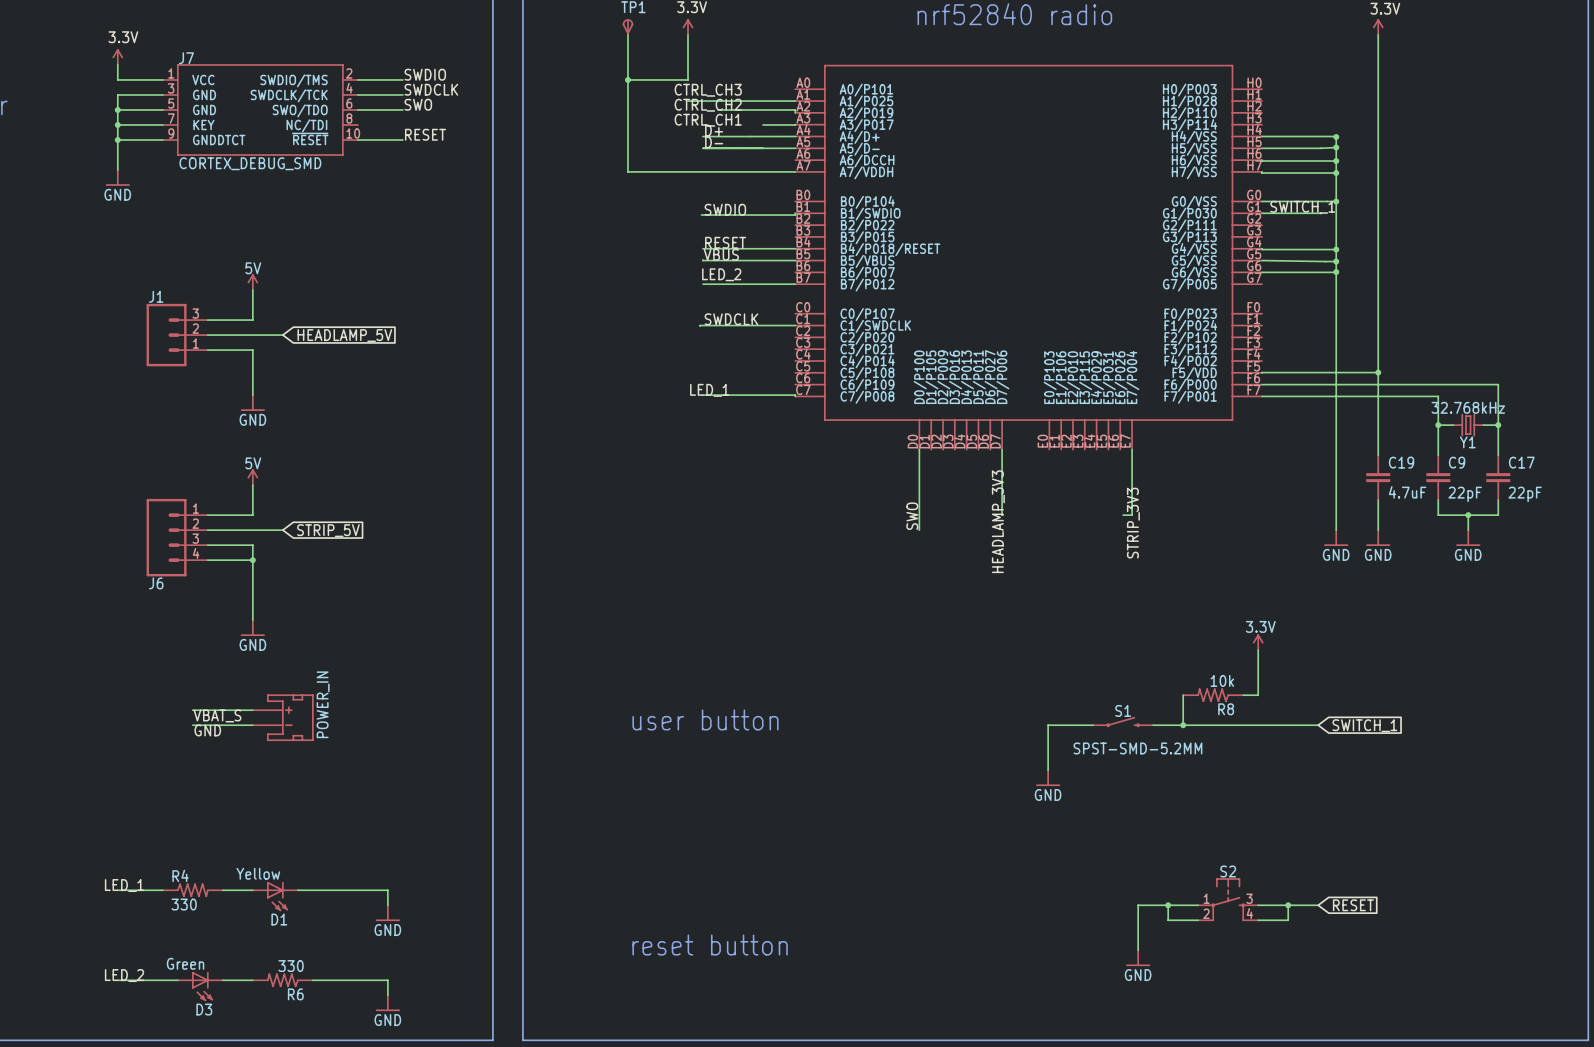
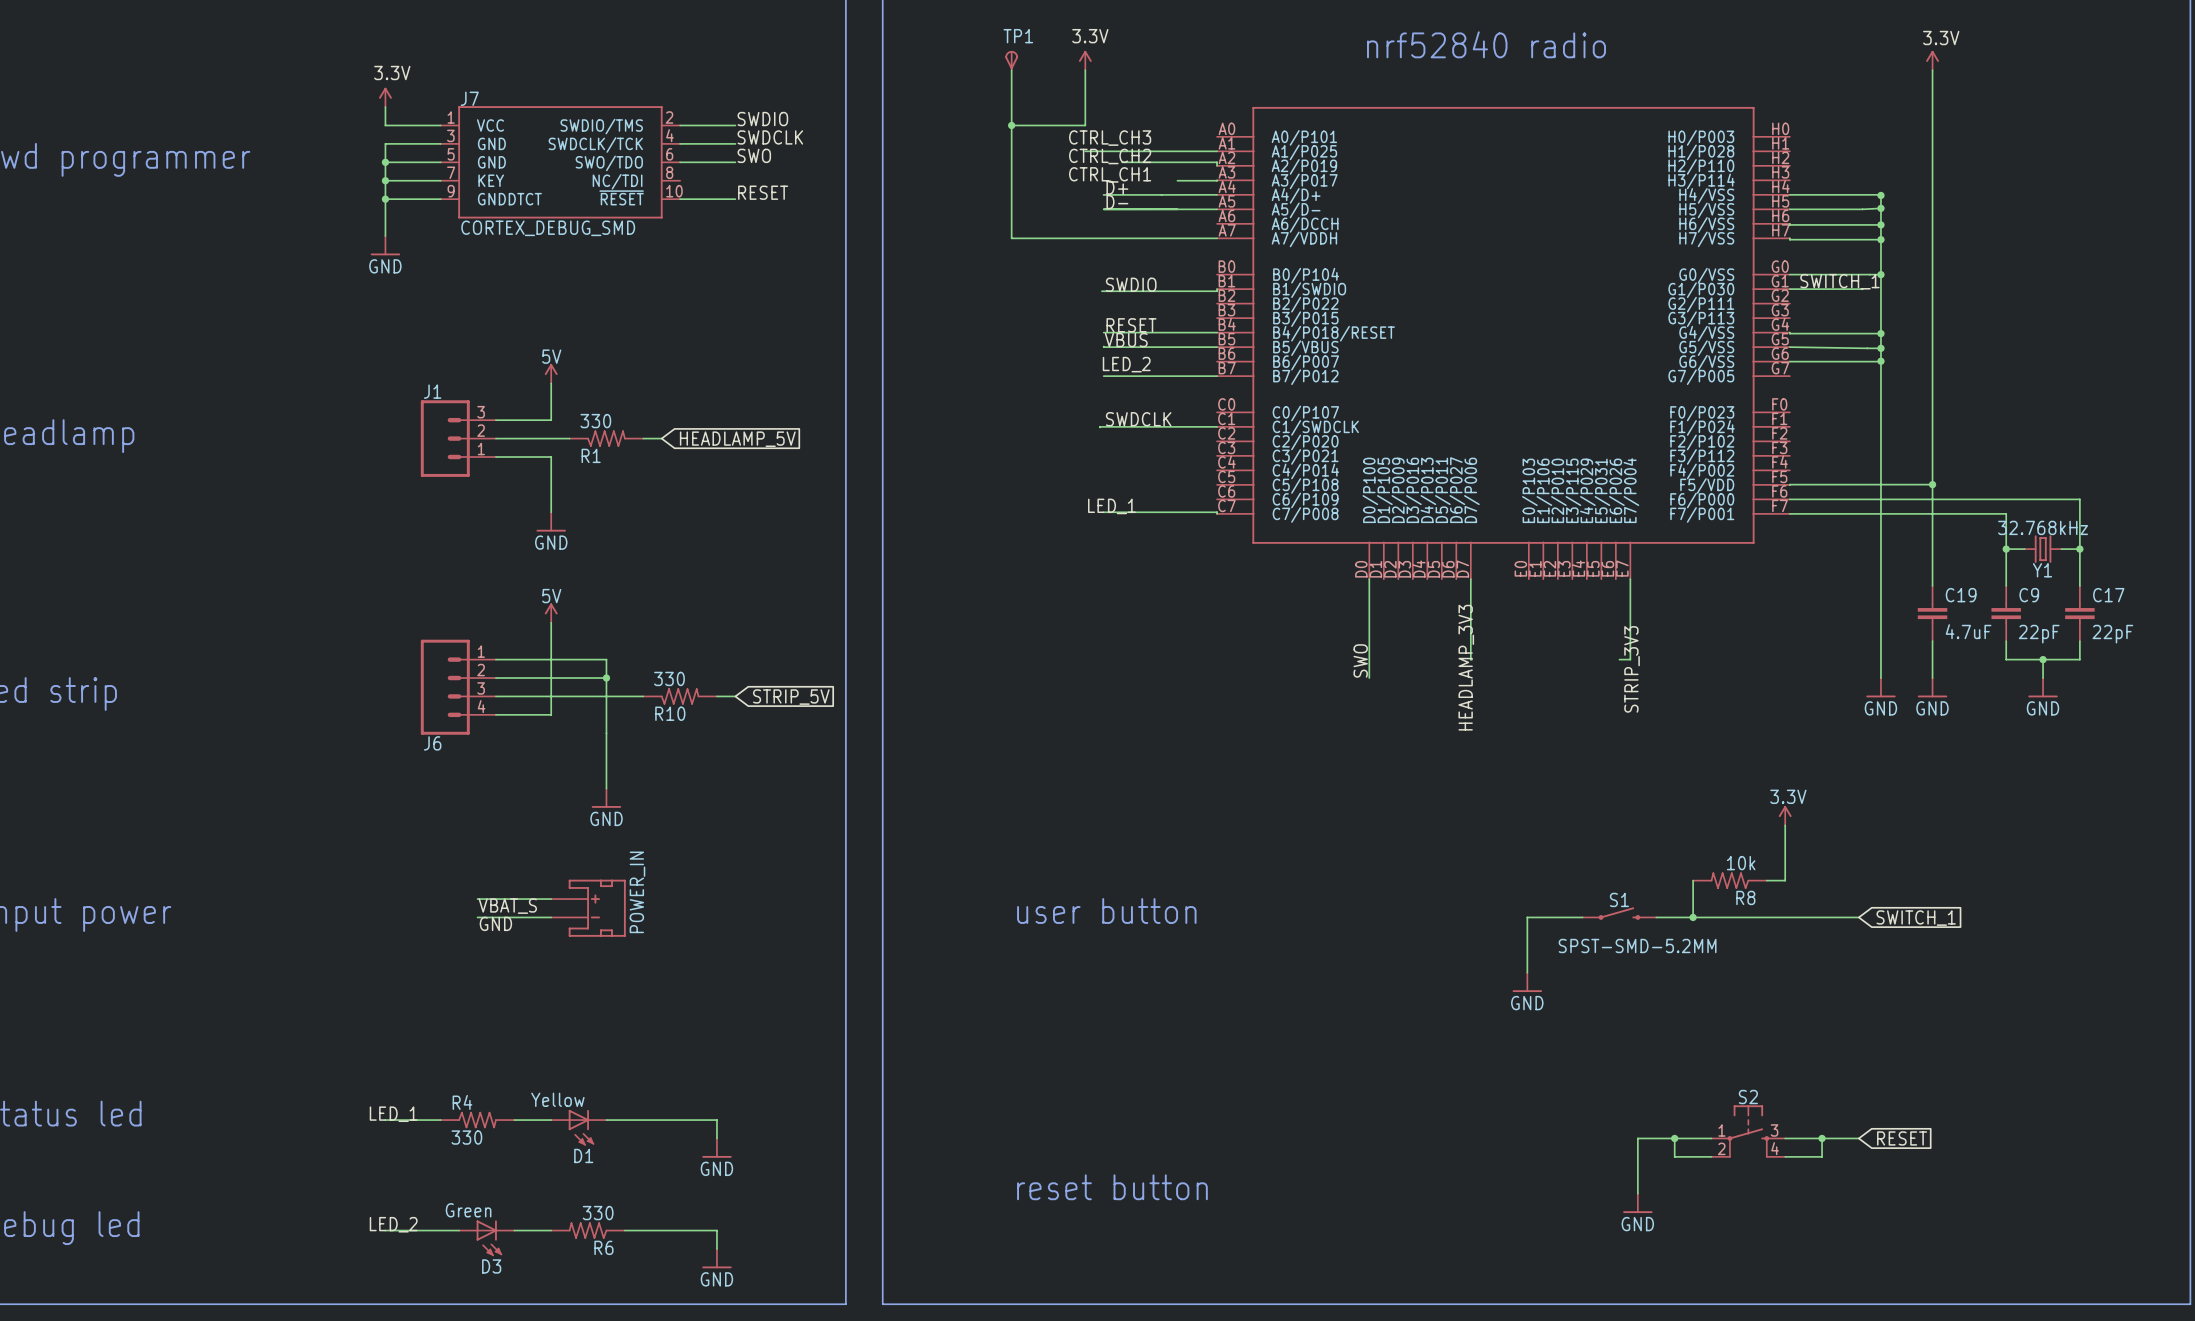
R1: none -> 330 (606, 438)
global label position: HEADLAMP_5V (344, 335) -> HEADLAMP_5V (737, 439)
wire: none -> (588, 678) (606, 678)
junction: none -> (606, 678)
global label position: STRIP_5V (328, 530) -> STRIP_5V (791, 697)
wire: none -> (643, 696) (551, 696) (551, 659) (606, 659) (606, 788)
R10: none -> 330 (680, 696)
wire: none -> (716, 696) (735, 696)
wire: (252, 560) (252, 620) -> none
junction: (252, 560) -> none
power symbol position: GND (252, 628) -> GND (606, 798)

